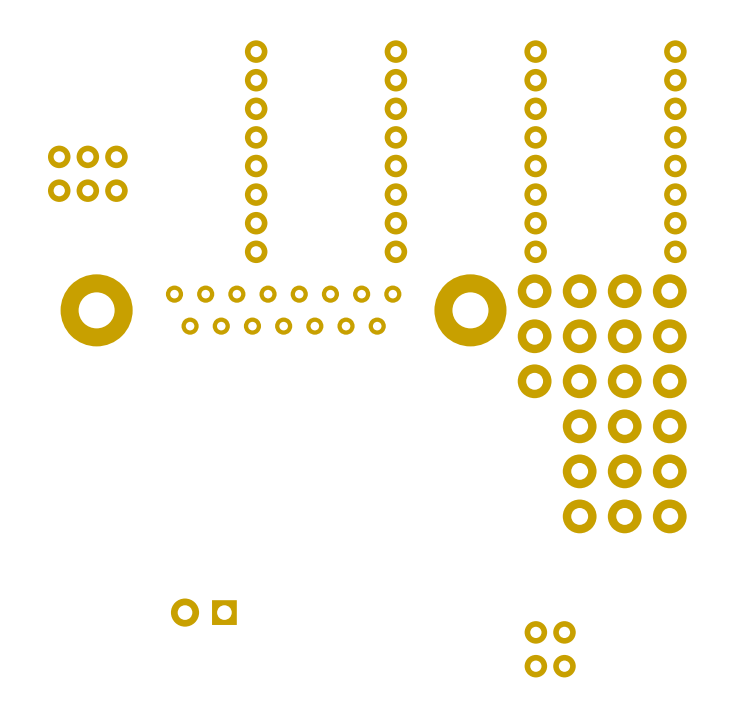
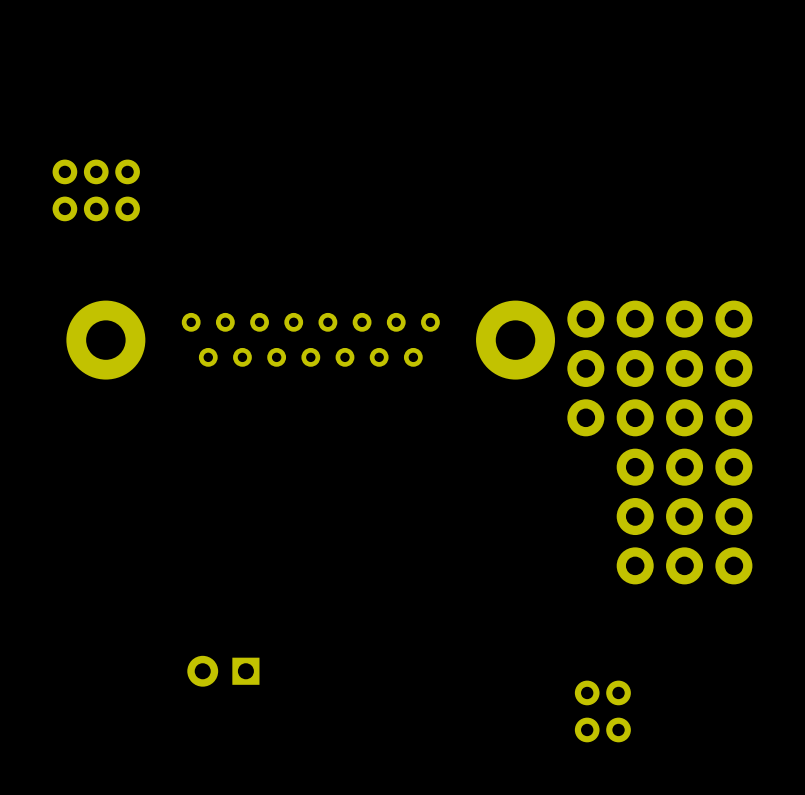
part: (256, 151) -> none
part: (395, 151) -> none
part: (535, 151) -> none
part: (675, 151) -> none

